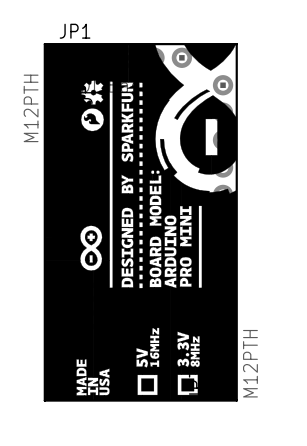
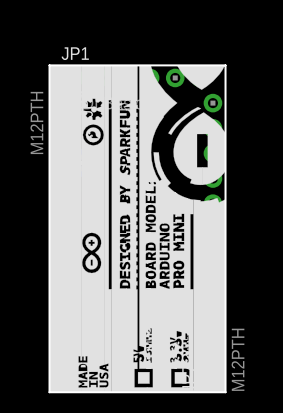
drawing: [44, 44, 129, 401] -> none
drawing: none -> [49, 65, 127, 393]
drawing shape: [126, 44, 144, 401] -> [123, 65, 148, 393]
drawing: [128, 44, 198, 401] -> none
drawing: none -> [146, 65, 178, 393]
drawing shape: [170, 163, 186, 401] -> [162, 171, 188, 393]
drawing shape: [181, 188, 203, 401] -> [187, 198, 194, 393]
drawing: none -> [181, 344, 188, 362]

